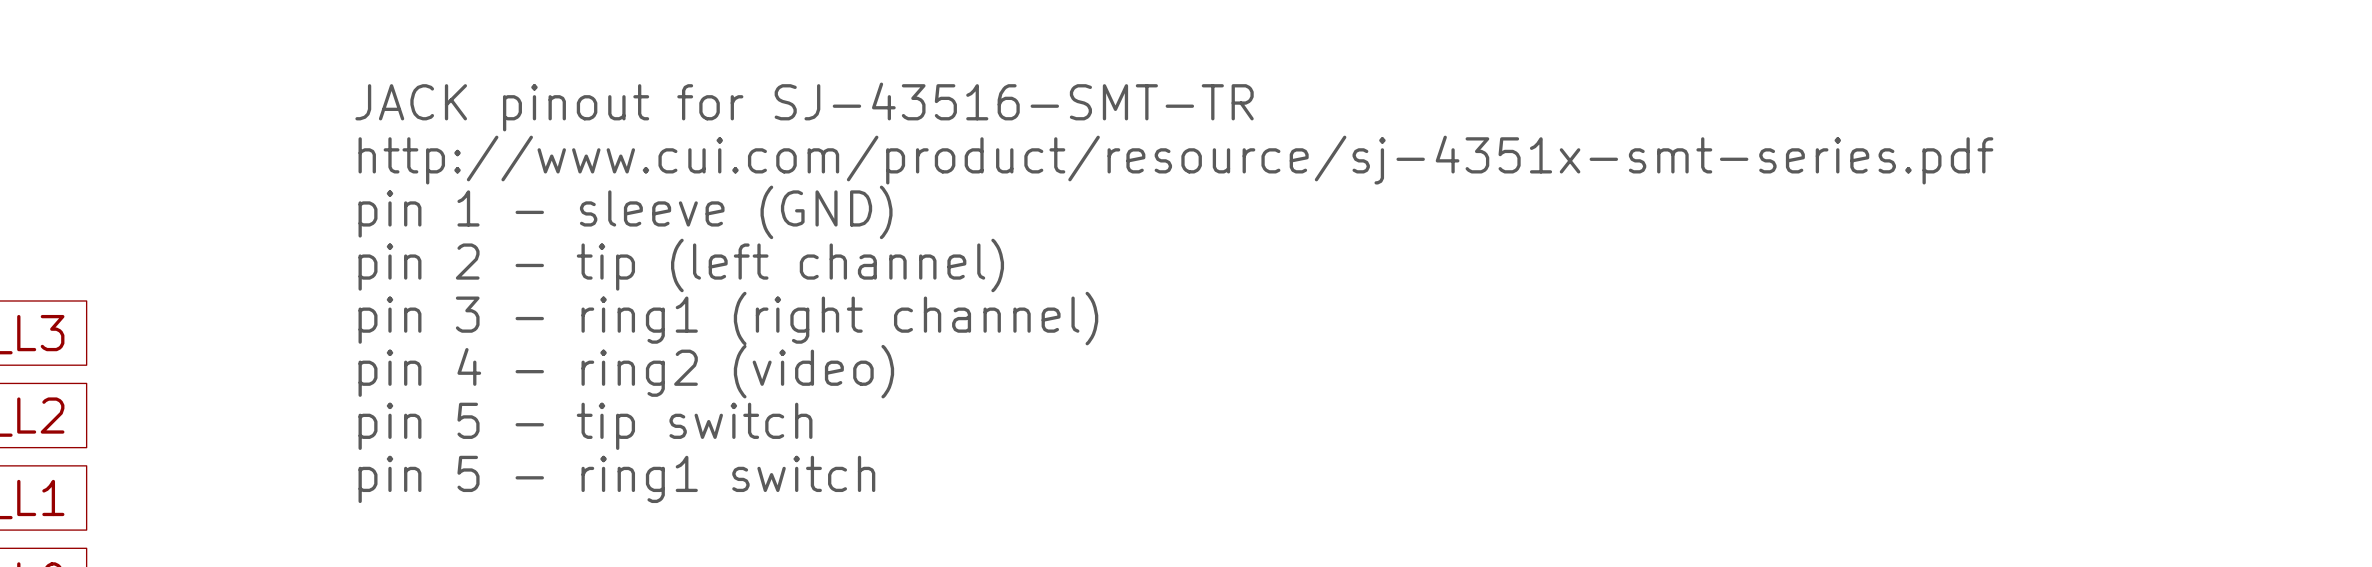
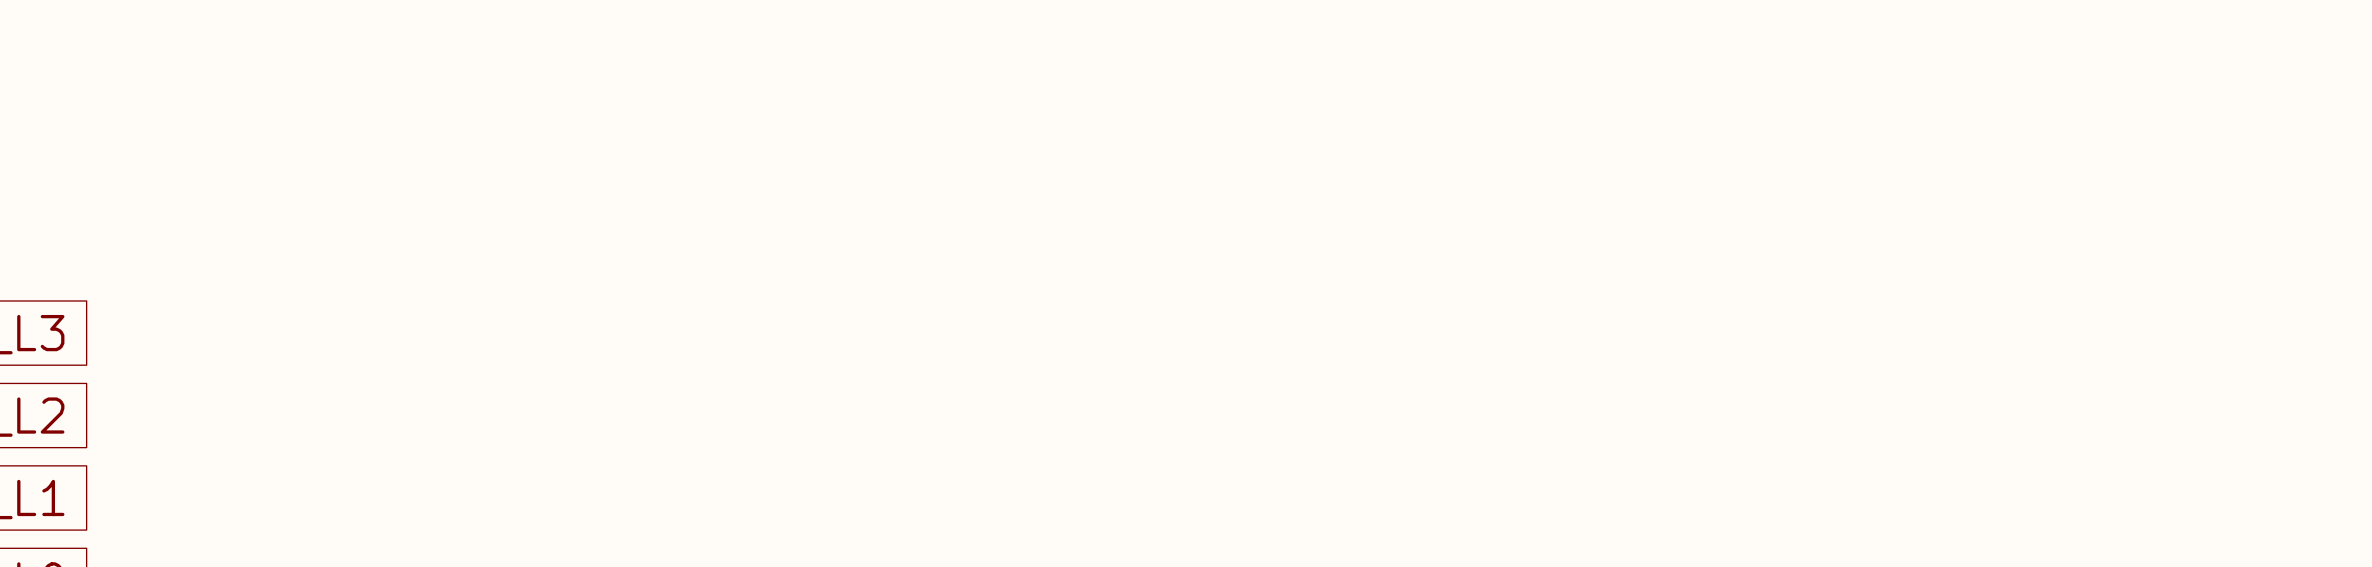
text: JACK pinout for SJ-43516-SMT-TR (804, 106) -> none
text: http://www.cui.com/product/resource/sj-4351x-smt-series.pdf (1175, 160) -> none
text: pin 1 - sleeve (GND) (625, 212) -> none
text: pin 2 - tip (left channel) (681, 265) -> none
text: pin 3 - ring1 (right channel) (728, 318) -> none
text: pin 4 - ring2 (video) (626, 371) -> none
text: pin 5 - tip switch (585, 426) -> none
text: pin 5 - ring1 switch (616, 479) -> none

